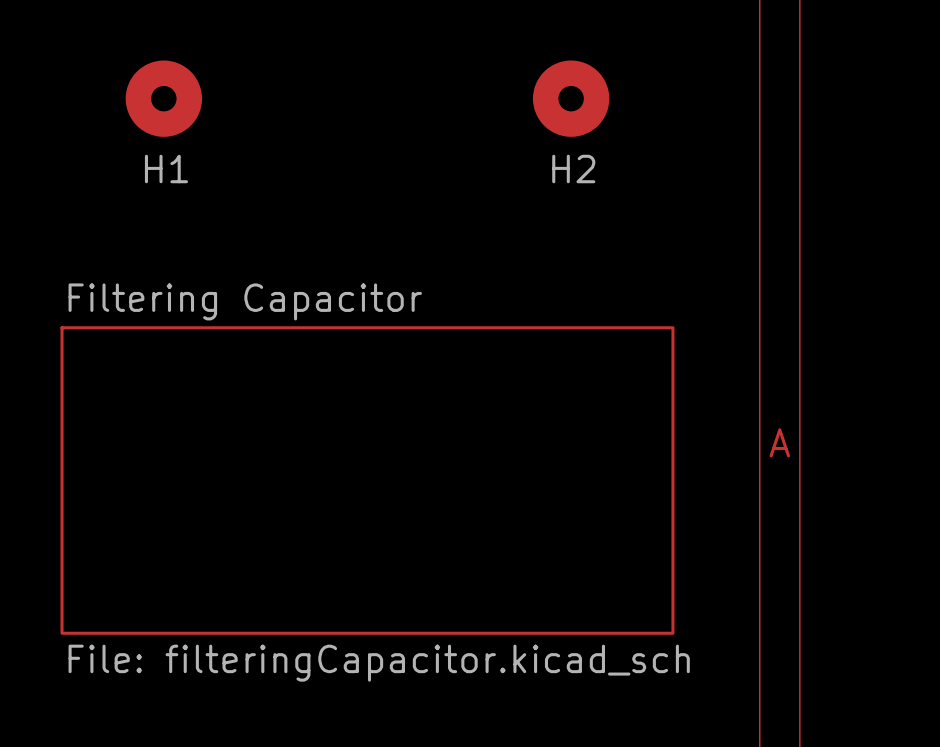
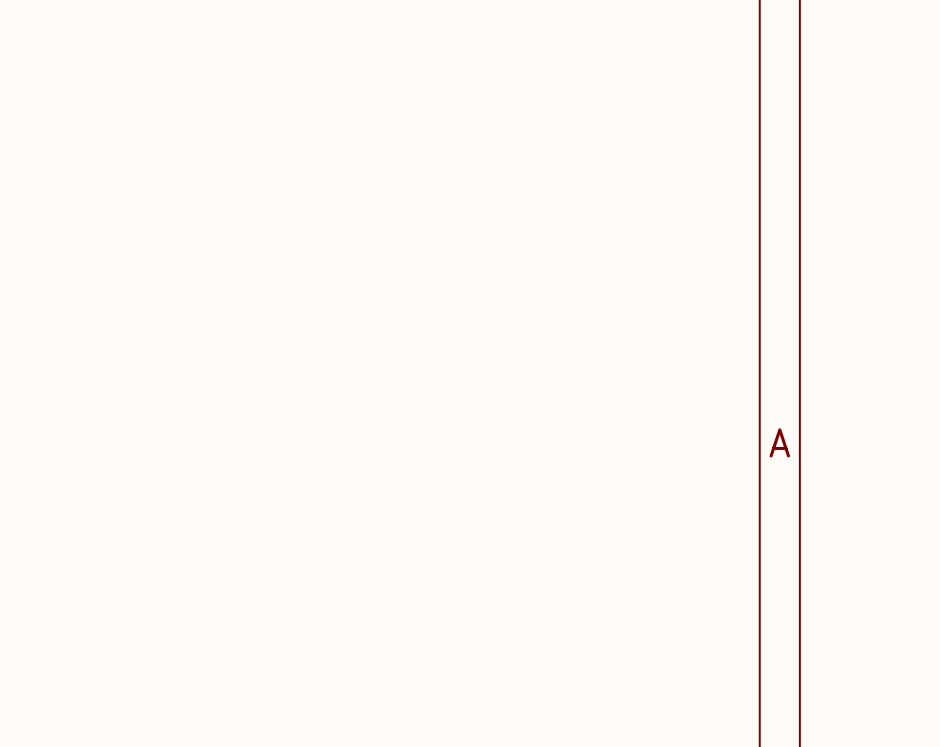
H1: (163, 98) -> none
H2: (571, 98) -> none
sheet Filtering Capacitor: File: filteringCapacitor.kicad_sch (367, 480) -> none

